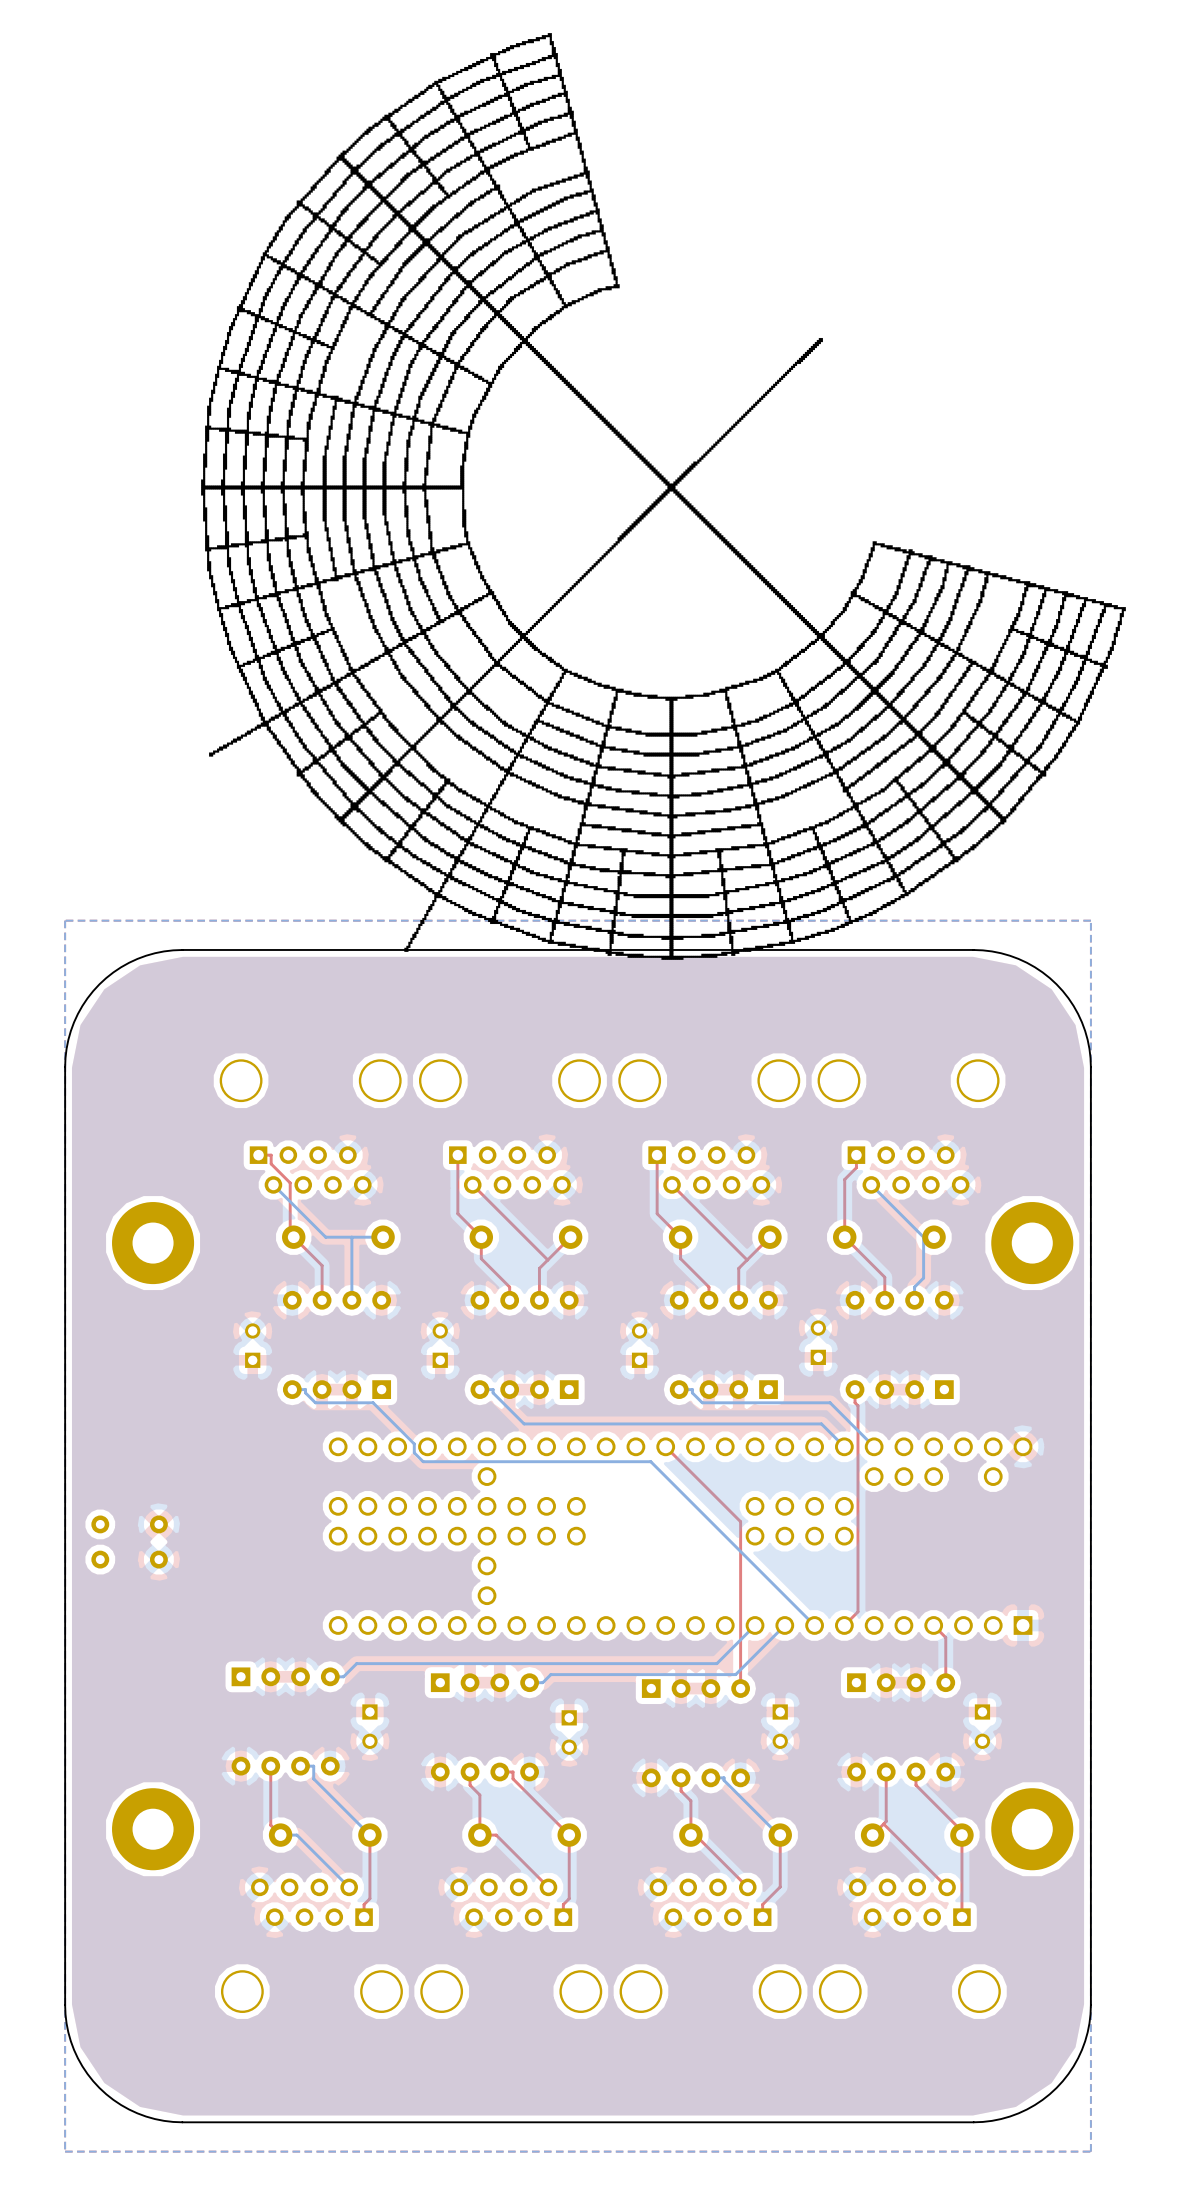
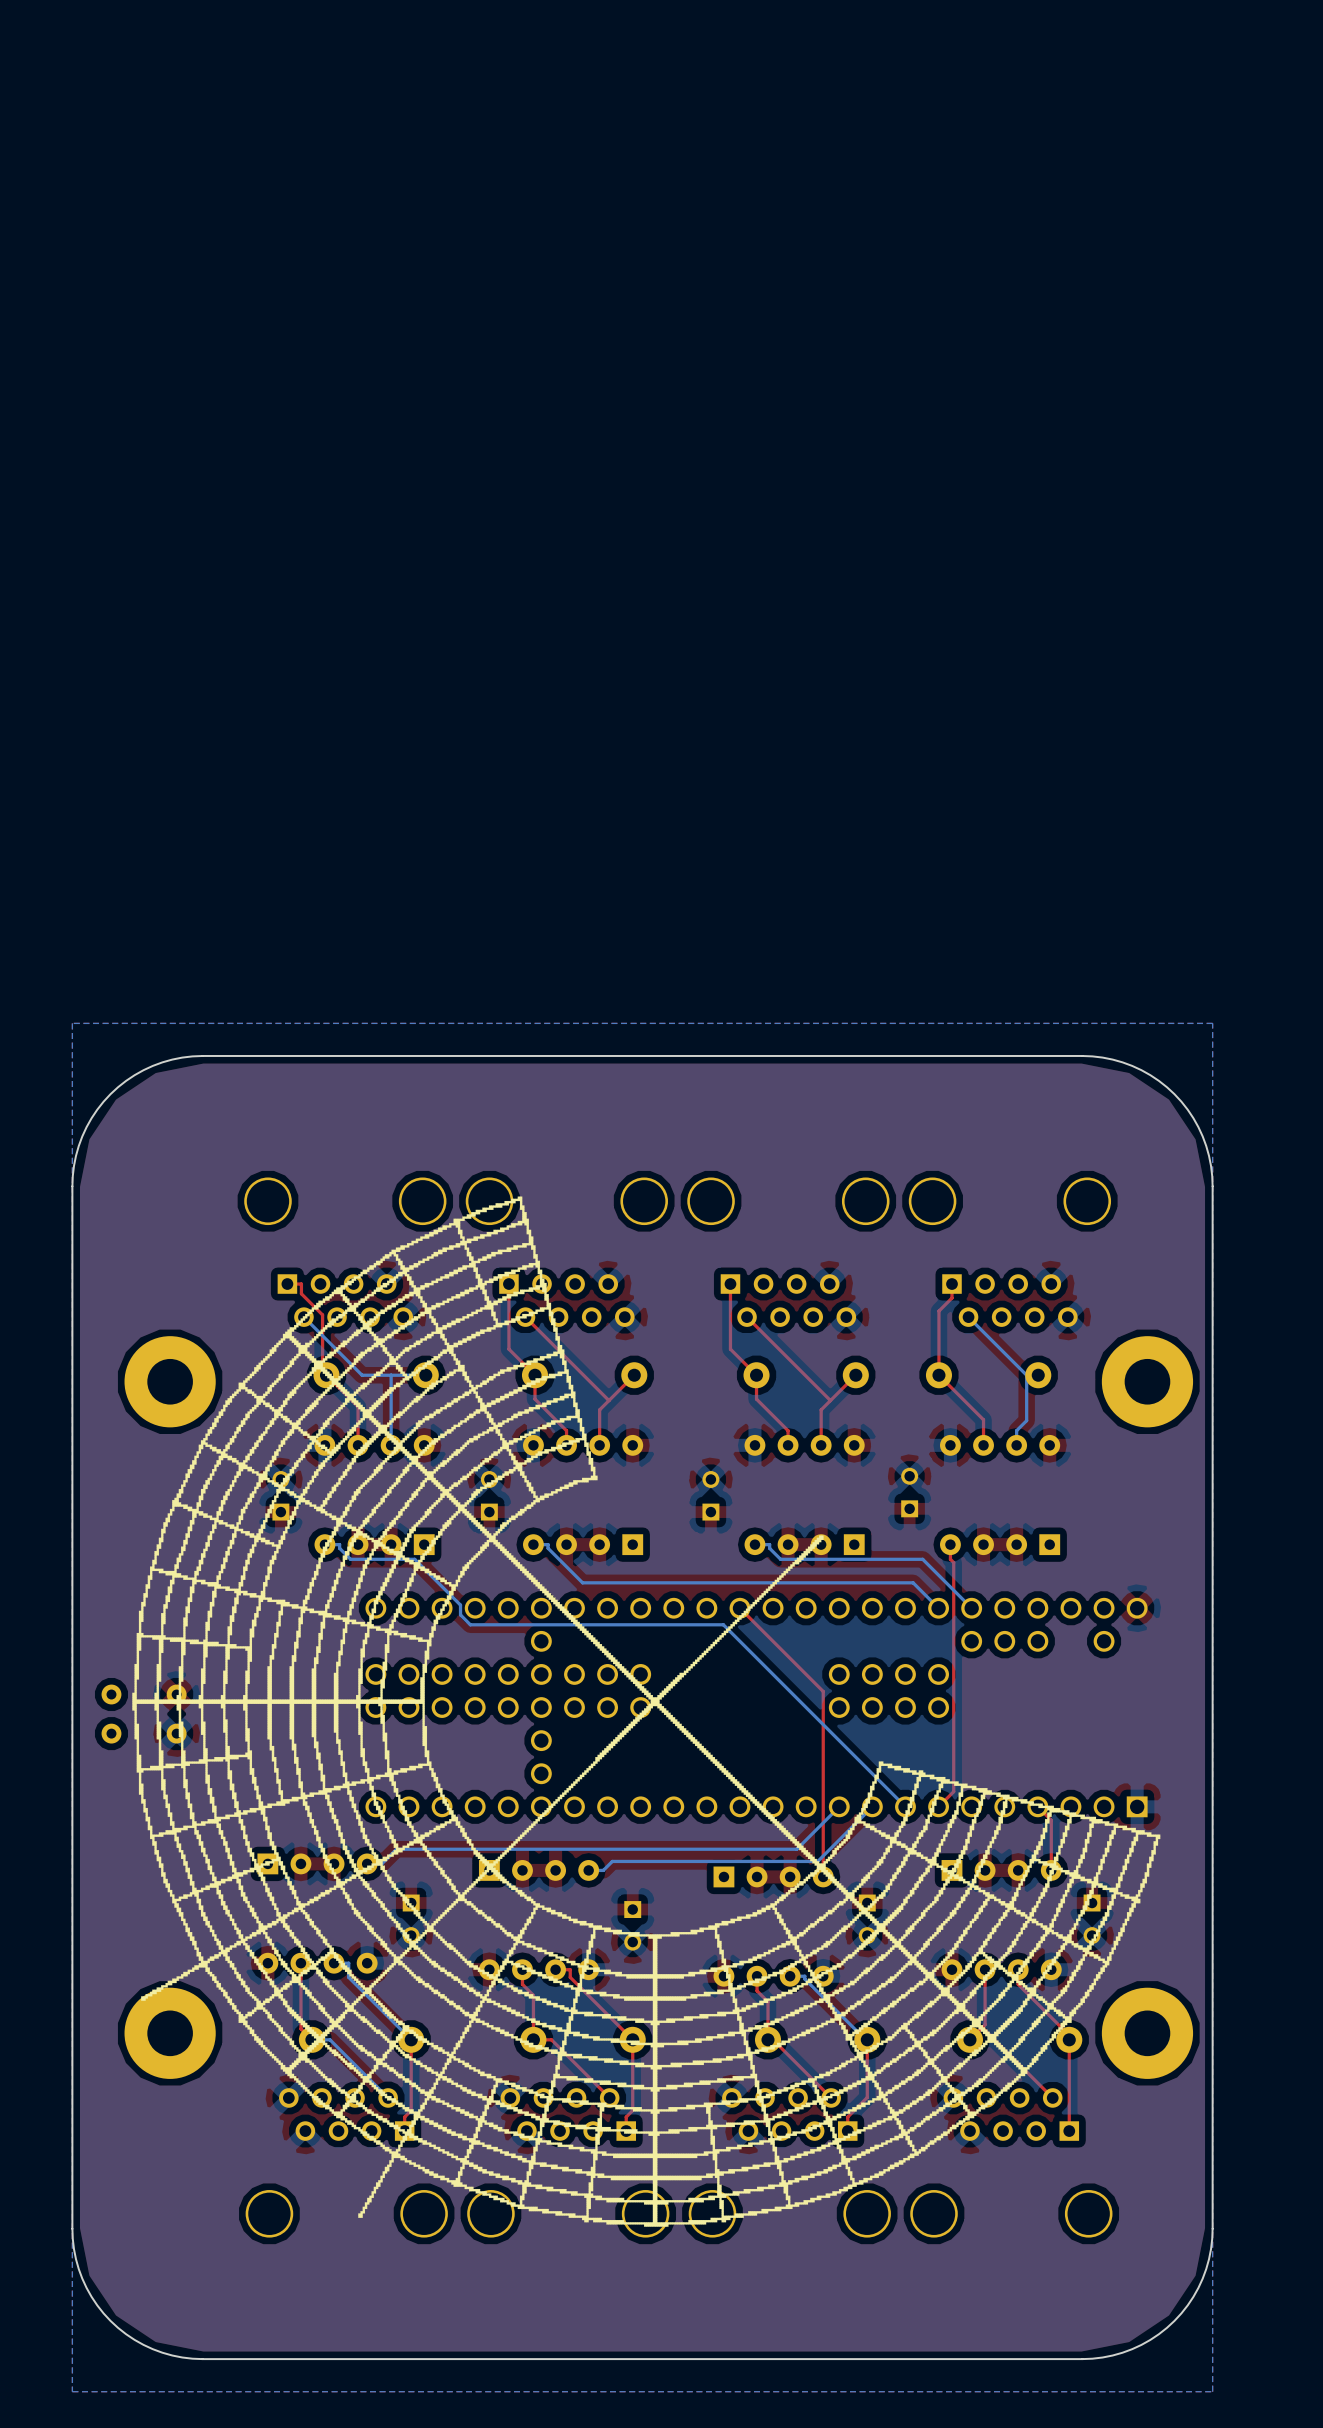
drawing: [201, 33, 1126, 960] -> none
drawing: none -> [132, 1196, 1161, 2227]

